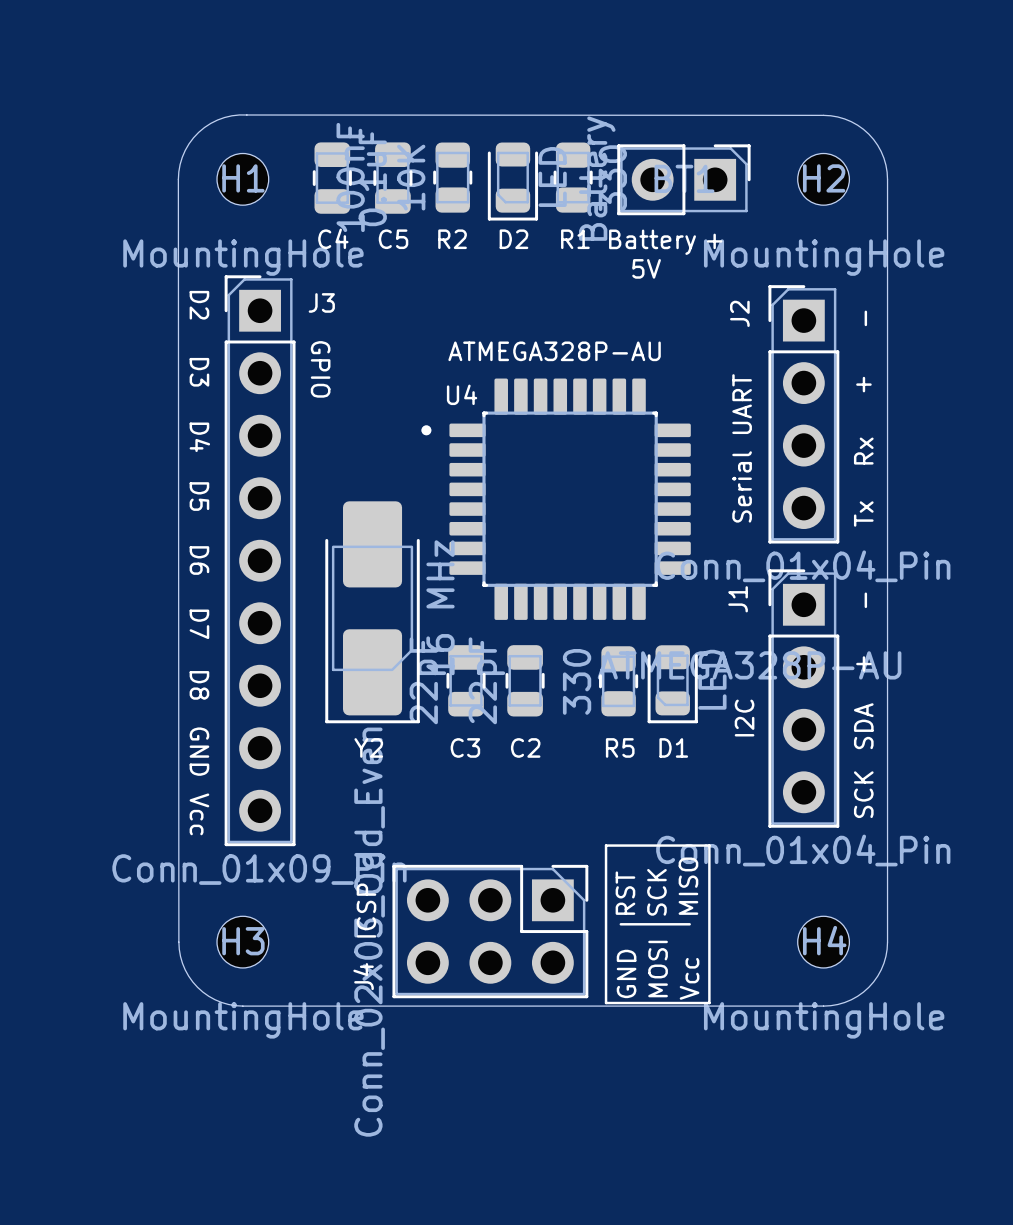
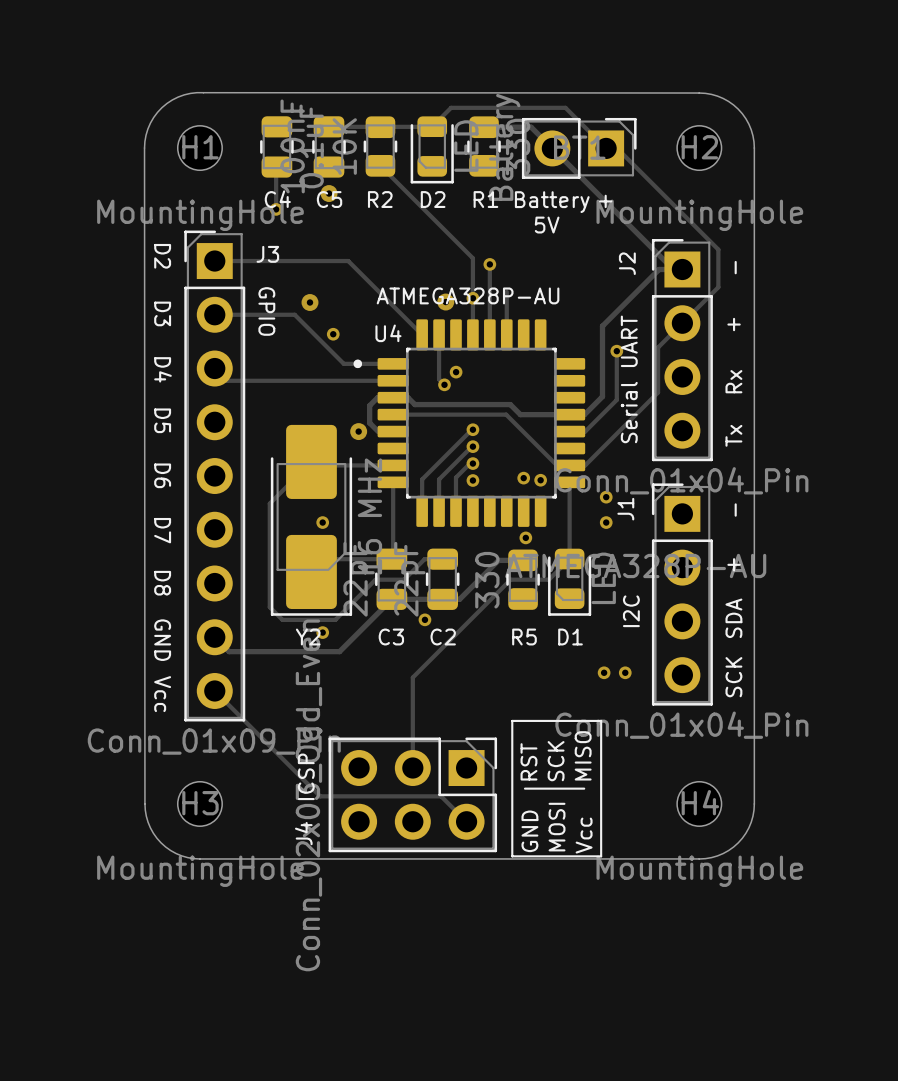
track: none -> (329, 126) (432, 126) (451, 107) (565, 107) (606, 148) (617, 148) (718, 249) (718, 287) (658, 347) (658, 392) (585, 465) (556, 465) (506, 414) (393, 414)
track: none -> (483, 127) (531, 127) (673, 269)
track: none -> (380, 165) (472, 258) (472, 334)
track: none -> (276, 167) (276, 209)
via: none -> (329, 193)
via: none -> (276, 209)
track: none -> (214, 261) (348, 261) (422, 334)
track: none -> (489, 264) (489, 334)
via: none -> (489, 264)
track: none -> (682, 269) (659, 269) (602, 326) (602, 396) (584, 414) (520, 414) (510, 404) (414, 404) (408, 397) (377, 397) (369, 405) (369, 422) (378, 431)
track: none -> (506, 291) (506, 334)
via: none -> (472, 298)
via: none -> (309, 302)
via: none -> (445, 302)
track: none -> (214, 314) (294, 314) (343, 363) (393, 363)
via: none -> (333, 334)
track: none -> (439, 334) (439, 379) (444, 384)
track: none -> (616, 349) (616, 399) (585, 431) (569, 431)
via: none -> (616, 351)
track: none -> (214, 368) (227, 380) (393, 380)
via: none -> (456, 372)
via: none -> (444, 384)
track: none -> (472, 429) (422, 479) (422, 511)
via: none -> (472, 429)
via: none -> (358, 431)
track: none -> (472, 446) (439, 479) (439, 511)
via: none -> (472, 446)
track: none -> (472, 463) (469, 463) (455, 477) (455, 511)
via: none -> (472, 463)
track: none -> (393, 465) (314, 465) (311, 461) (269, 503) (269, 607) (282, 619) (335, 619) (375, 579) (404, 579) (424, 559) (442, 559)
via: none -> (523, 478)
via: none -> (472, 480)
via: none -> (540, 480)
track: none -> (393, 482) (393, 557) (324, 559) (311, 571)
track: none -> (569, 482) (569, 559) (548, 579) (510, 579) (412, 677) (412, 768)
via: none -> (606, 497)
via: none -> (322, 522)
via: none -> (606, 522)
via: none -> (525, 537)
track: none -> (523, 560) (498, 560) (459, 599) (391, 599) (339, 651) (229, 651) (214, 637)
via: none -> (424, 619)
via: none -> (322, 632)
via: none -> (604, 672)
via: none -> (625, 672)
track: none -> (214, 690) (320, 796) (441, 796) (466, 821)

